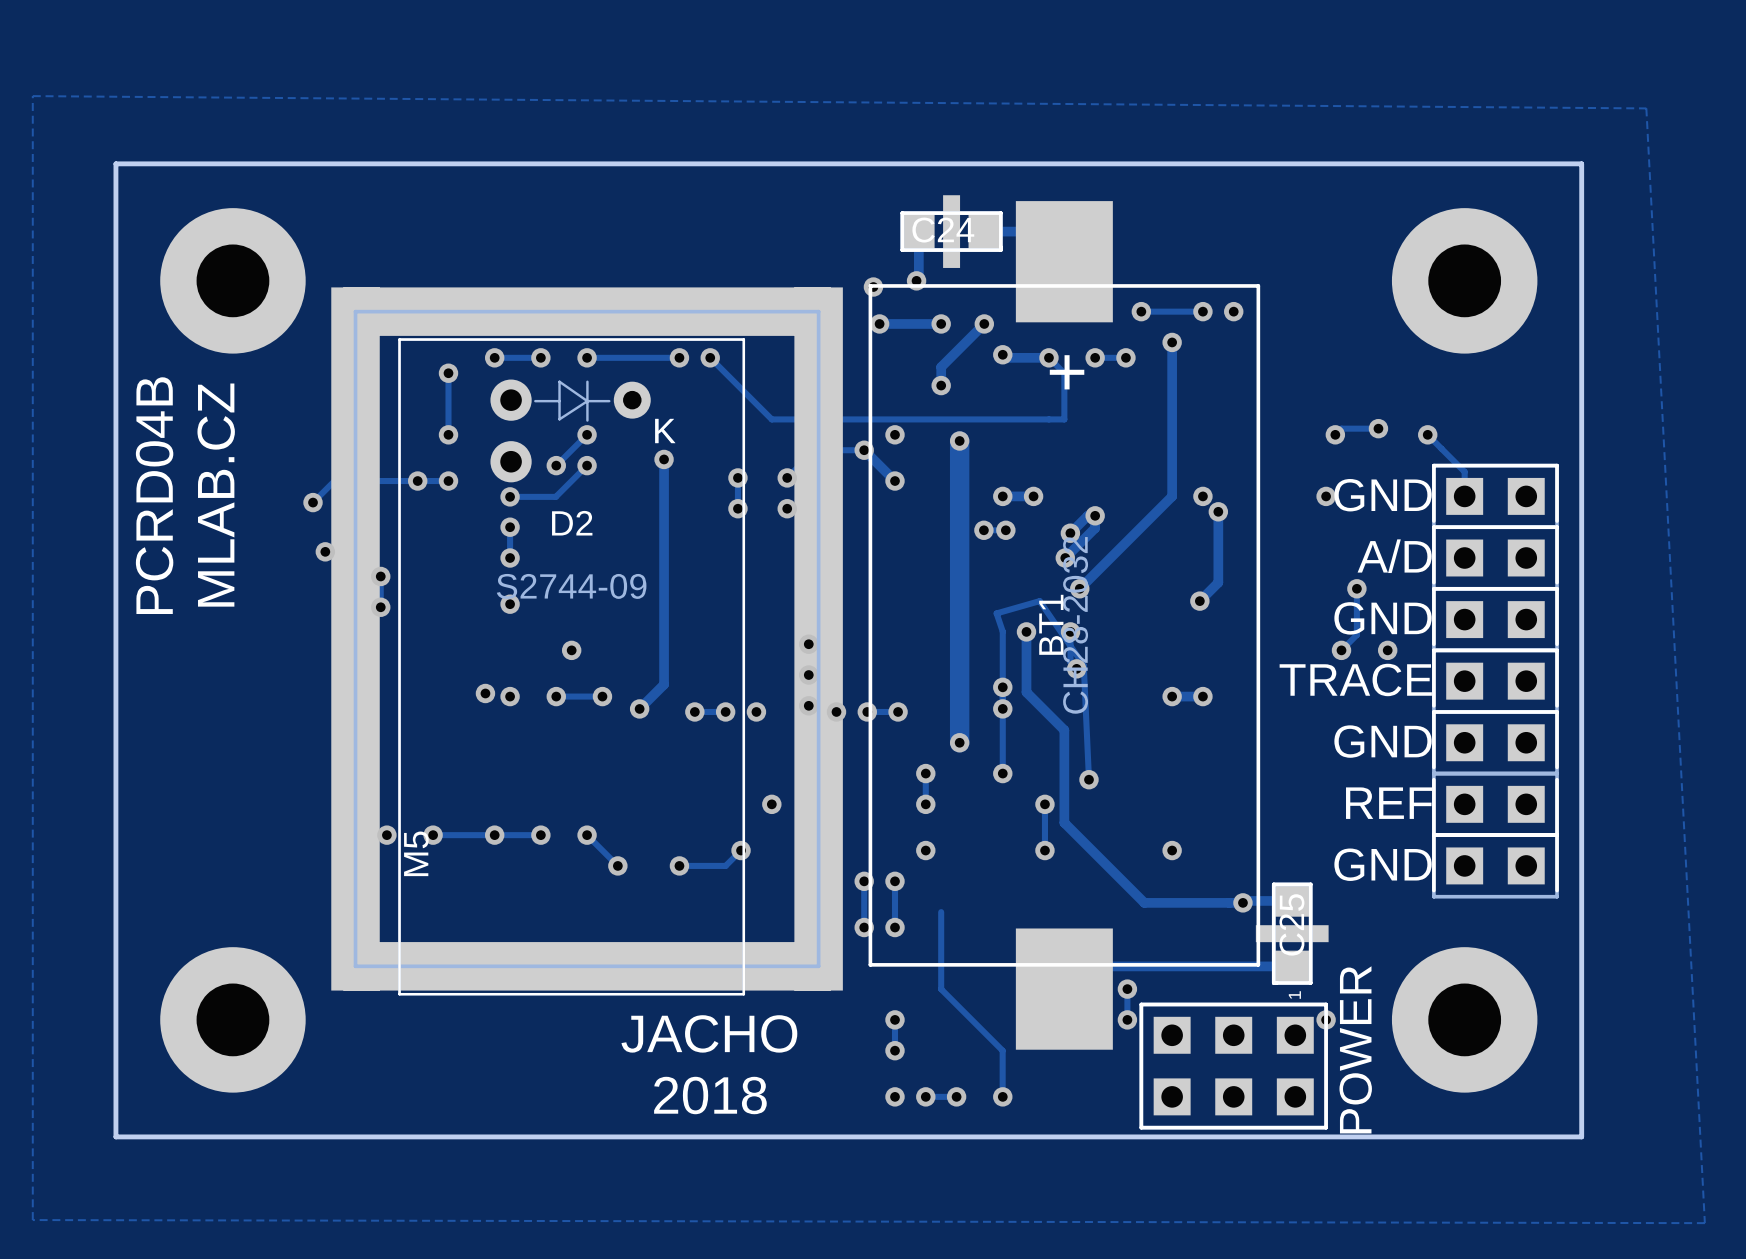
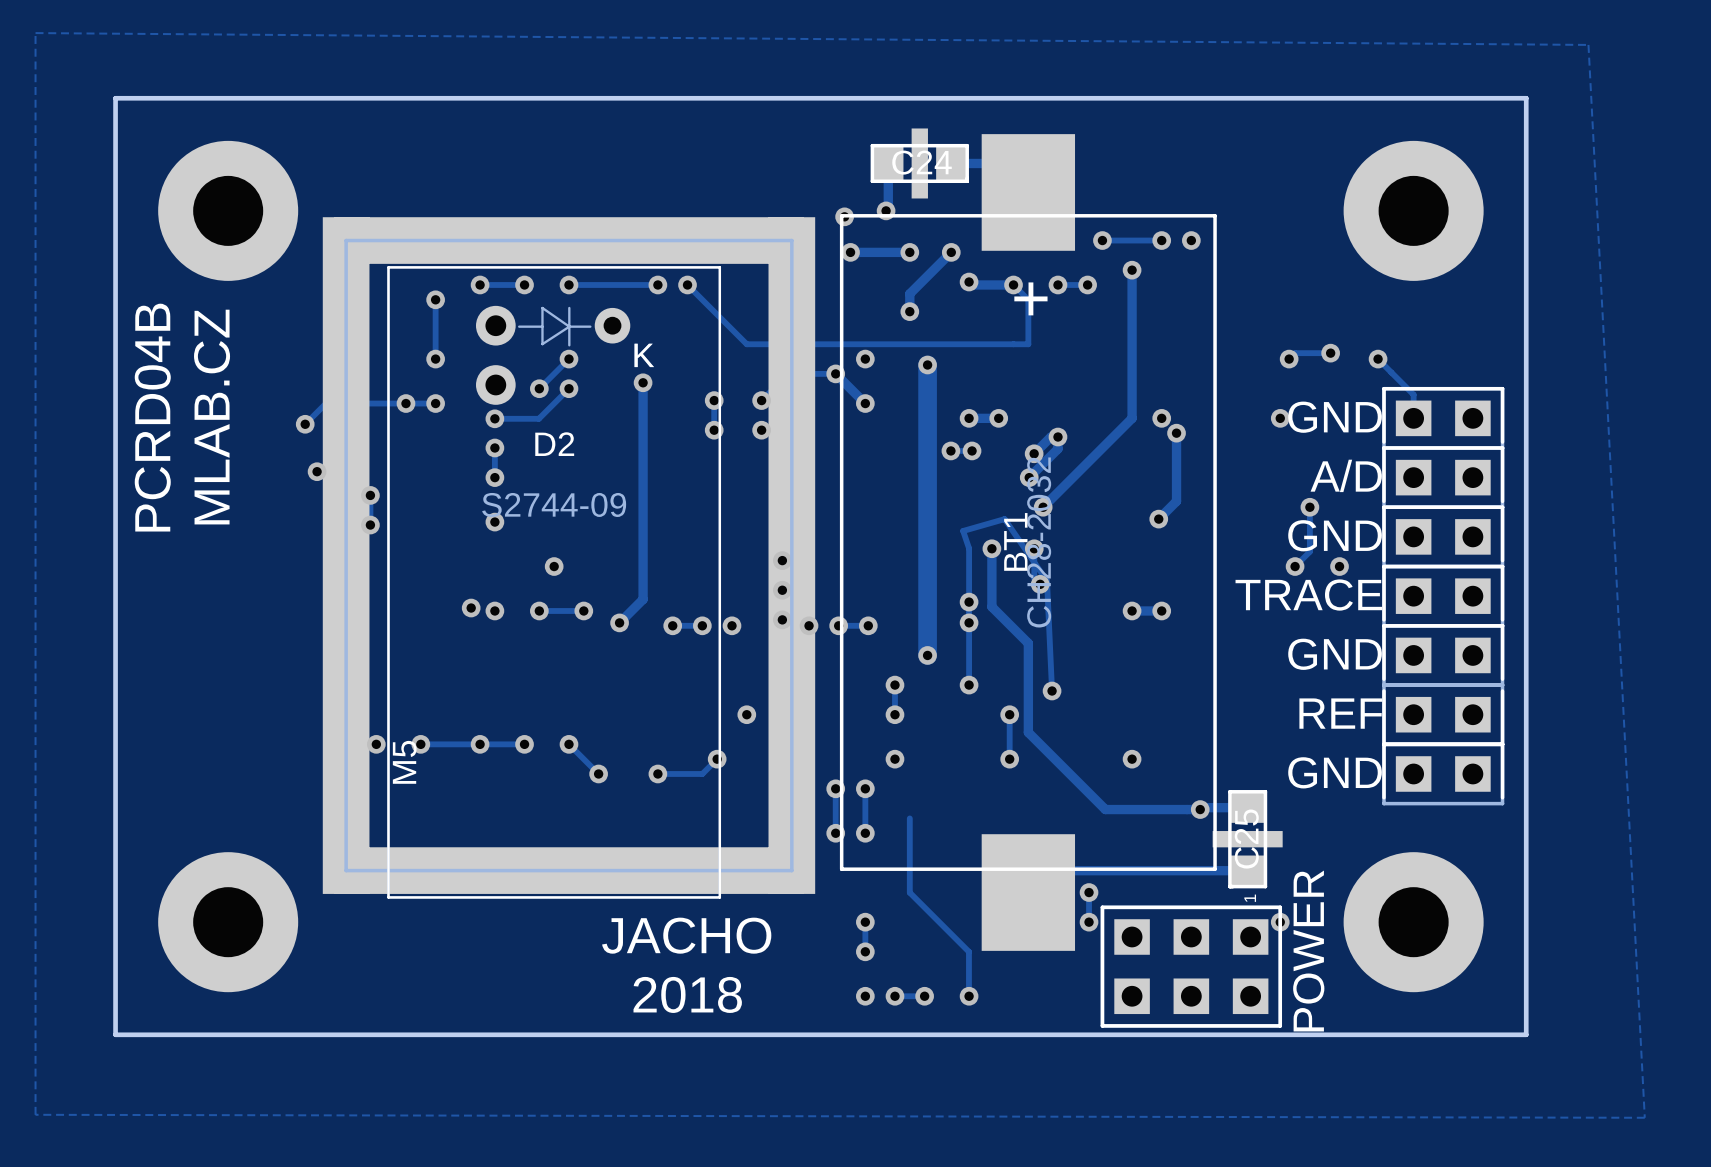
part footprint: [900, 195, 1003, 268] -> [870, 128, 969, 199]
part footprint: [1255, 882, 1329, 985] -> [1212, 790, 1283, 889]

